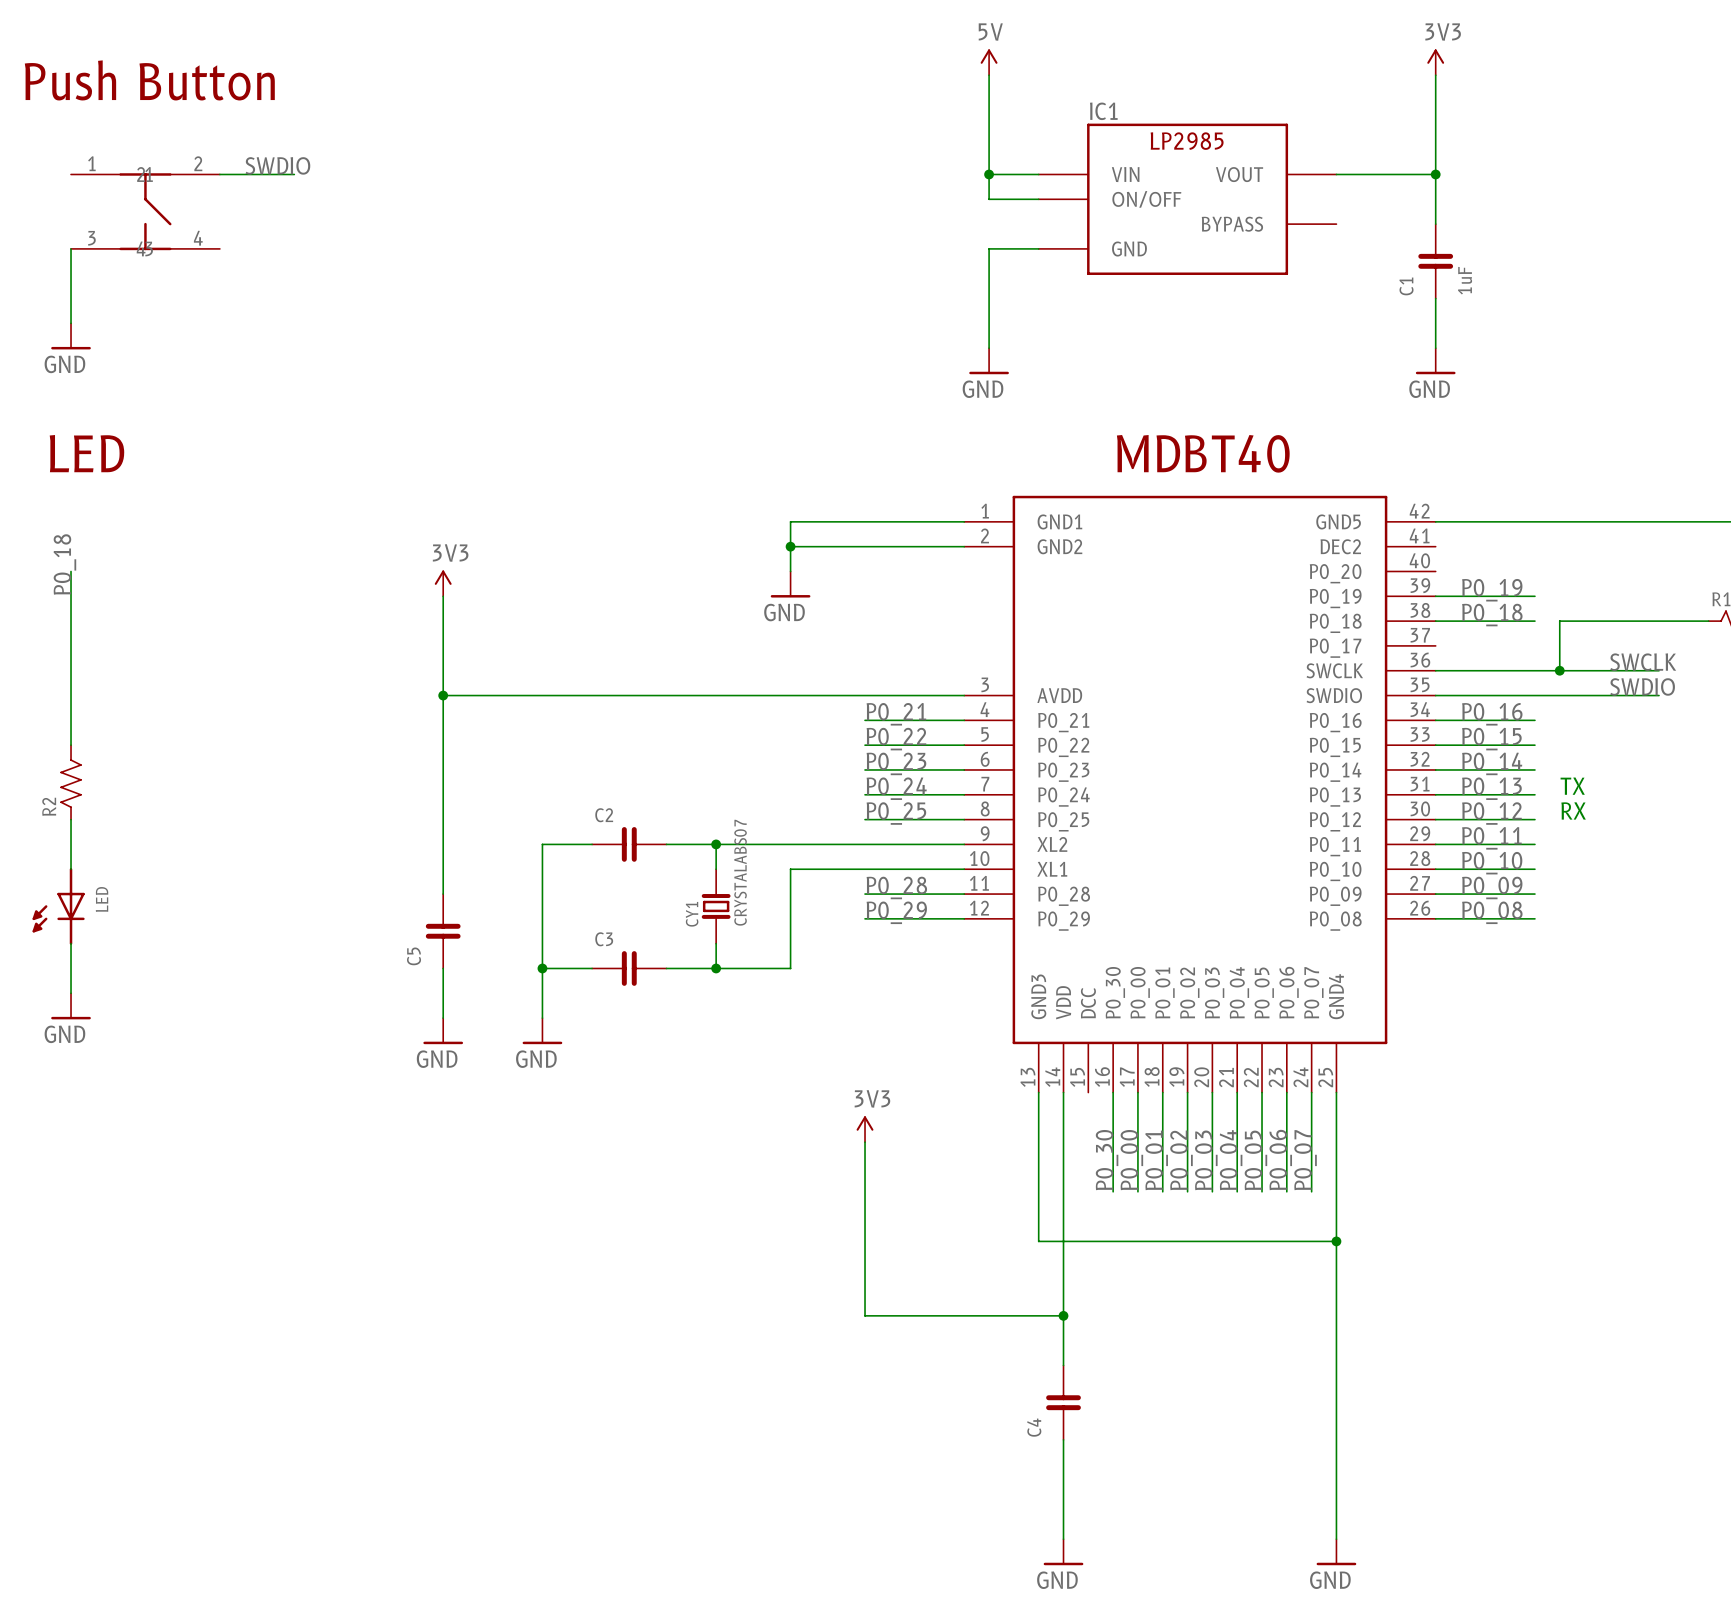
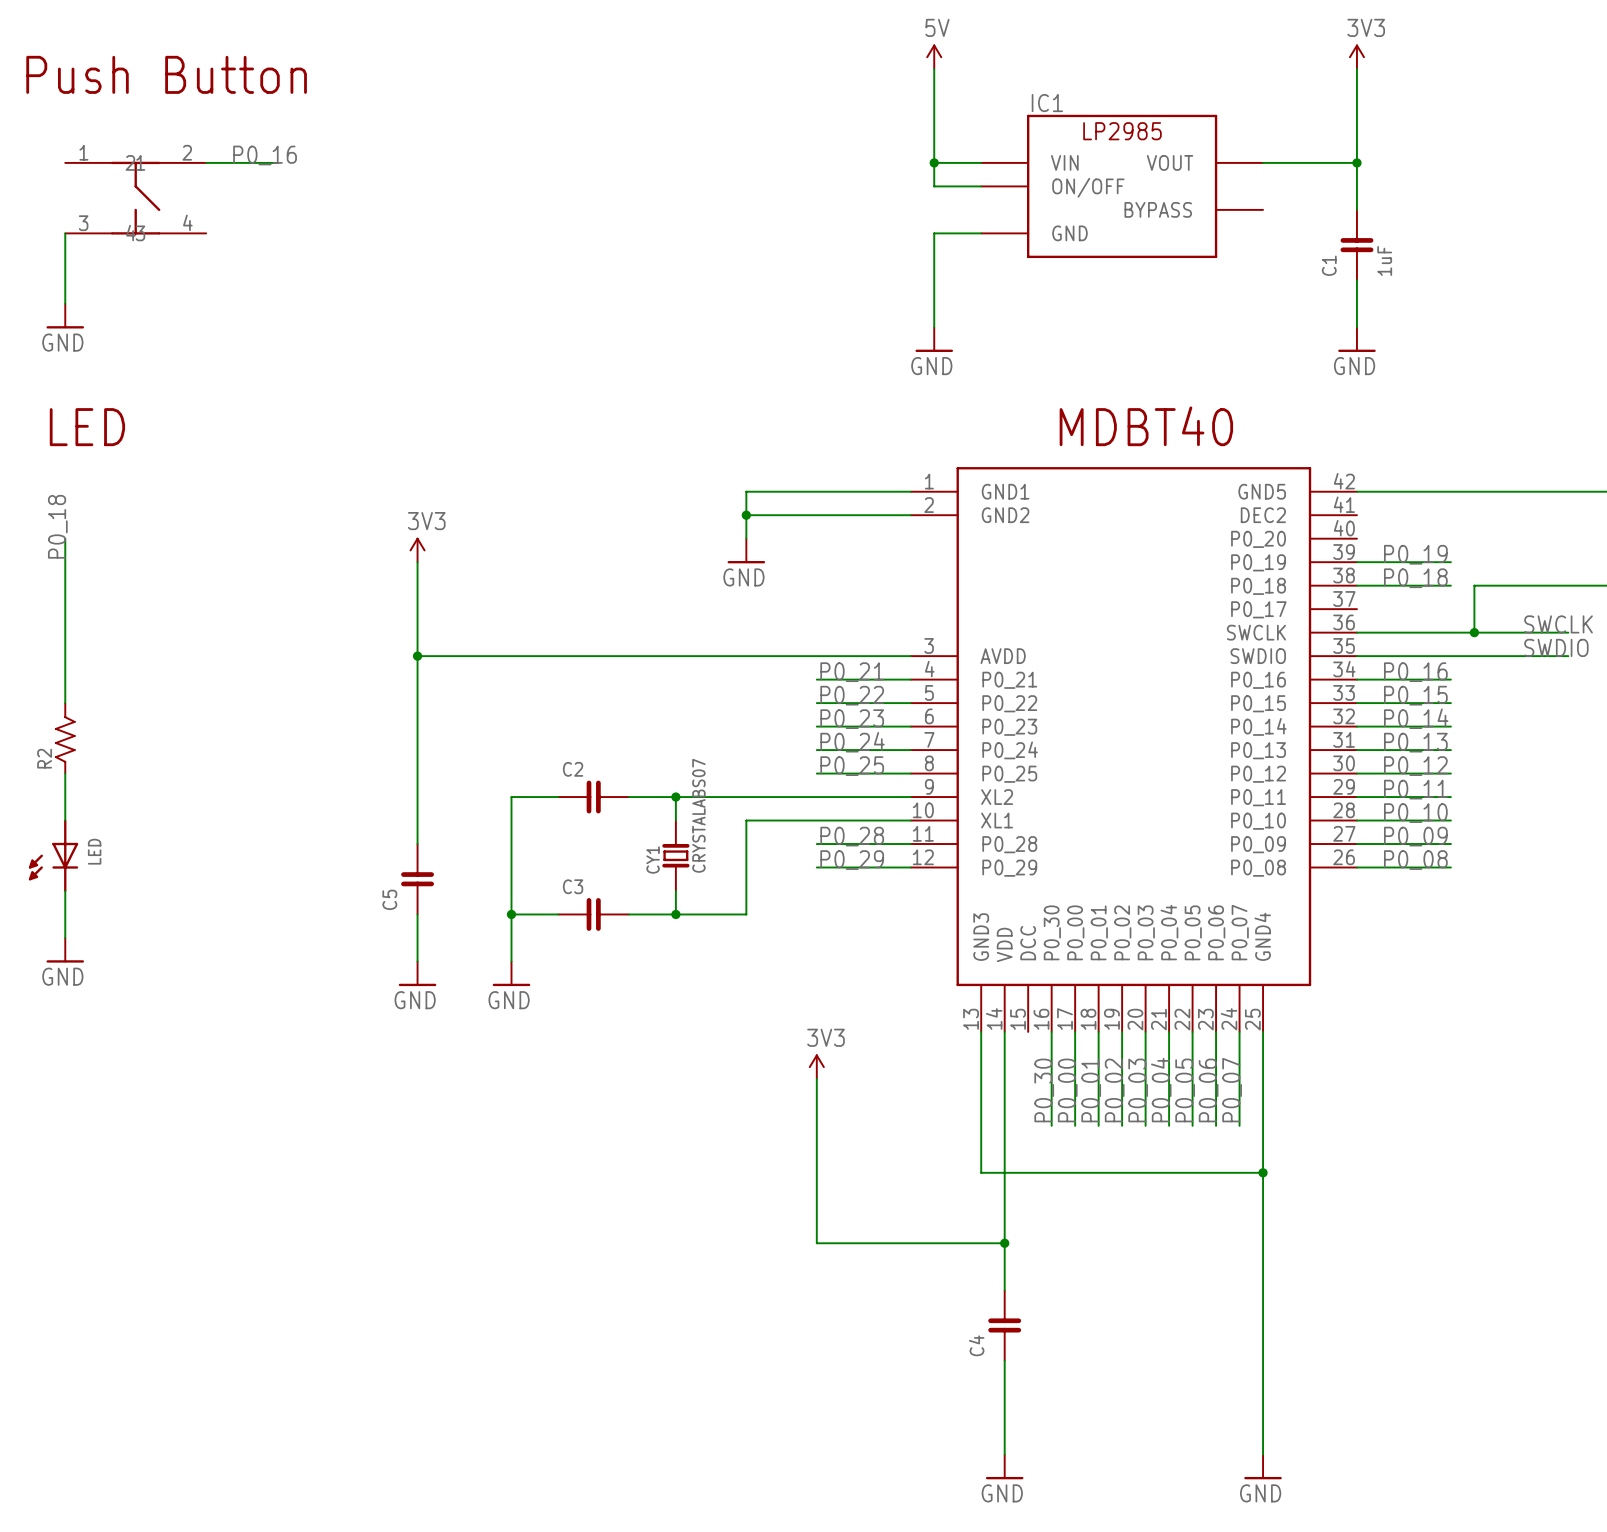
label: SWDIO (277, 165) -> P0_16 (265, 155)
text: TX (1572, 786) -> none
text: RX (1573, 810) -> none

